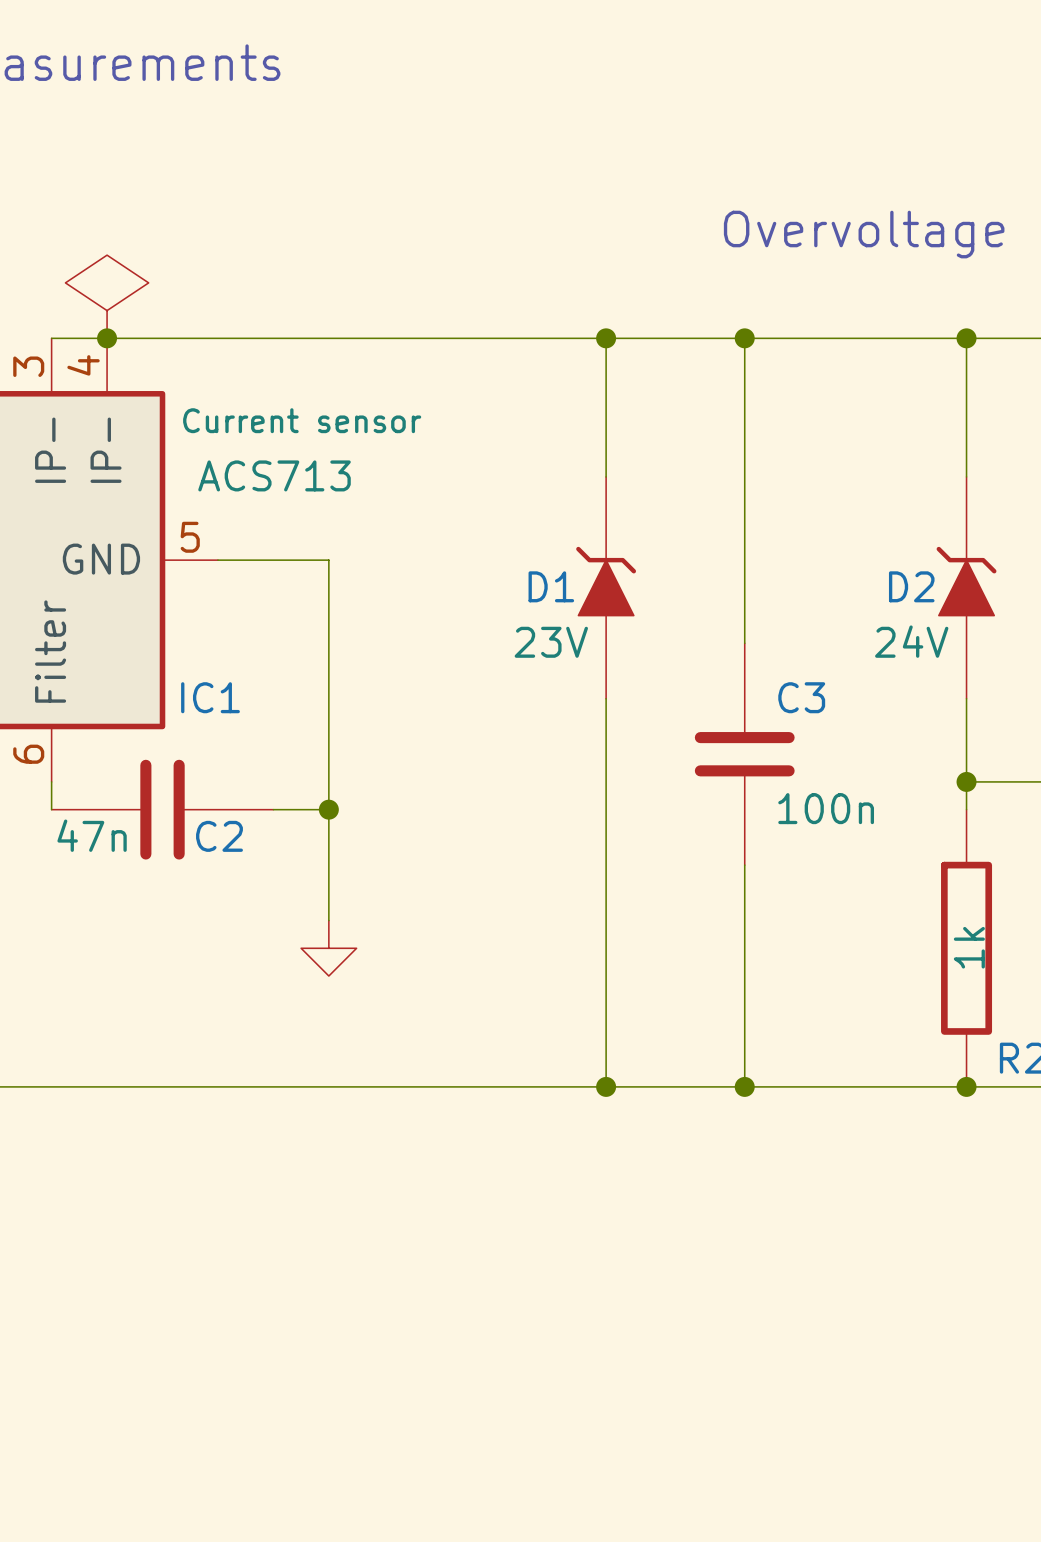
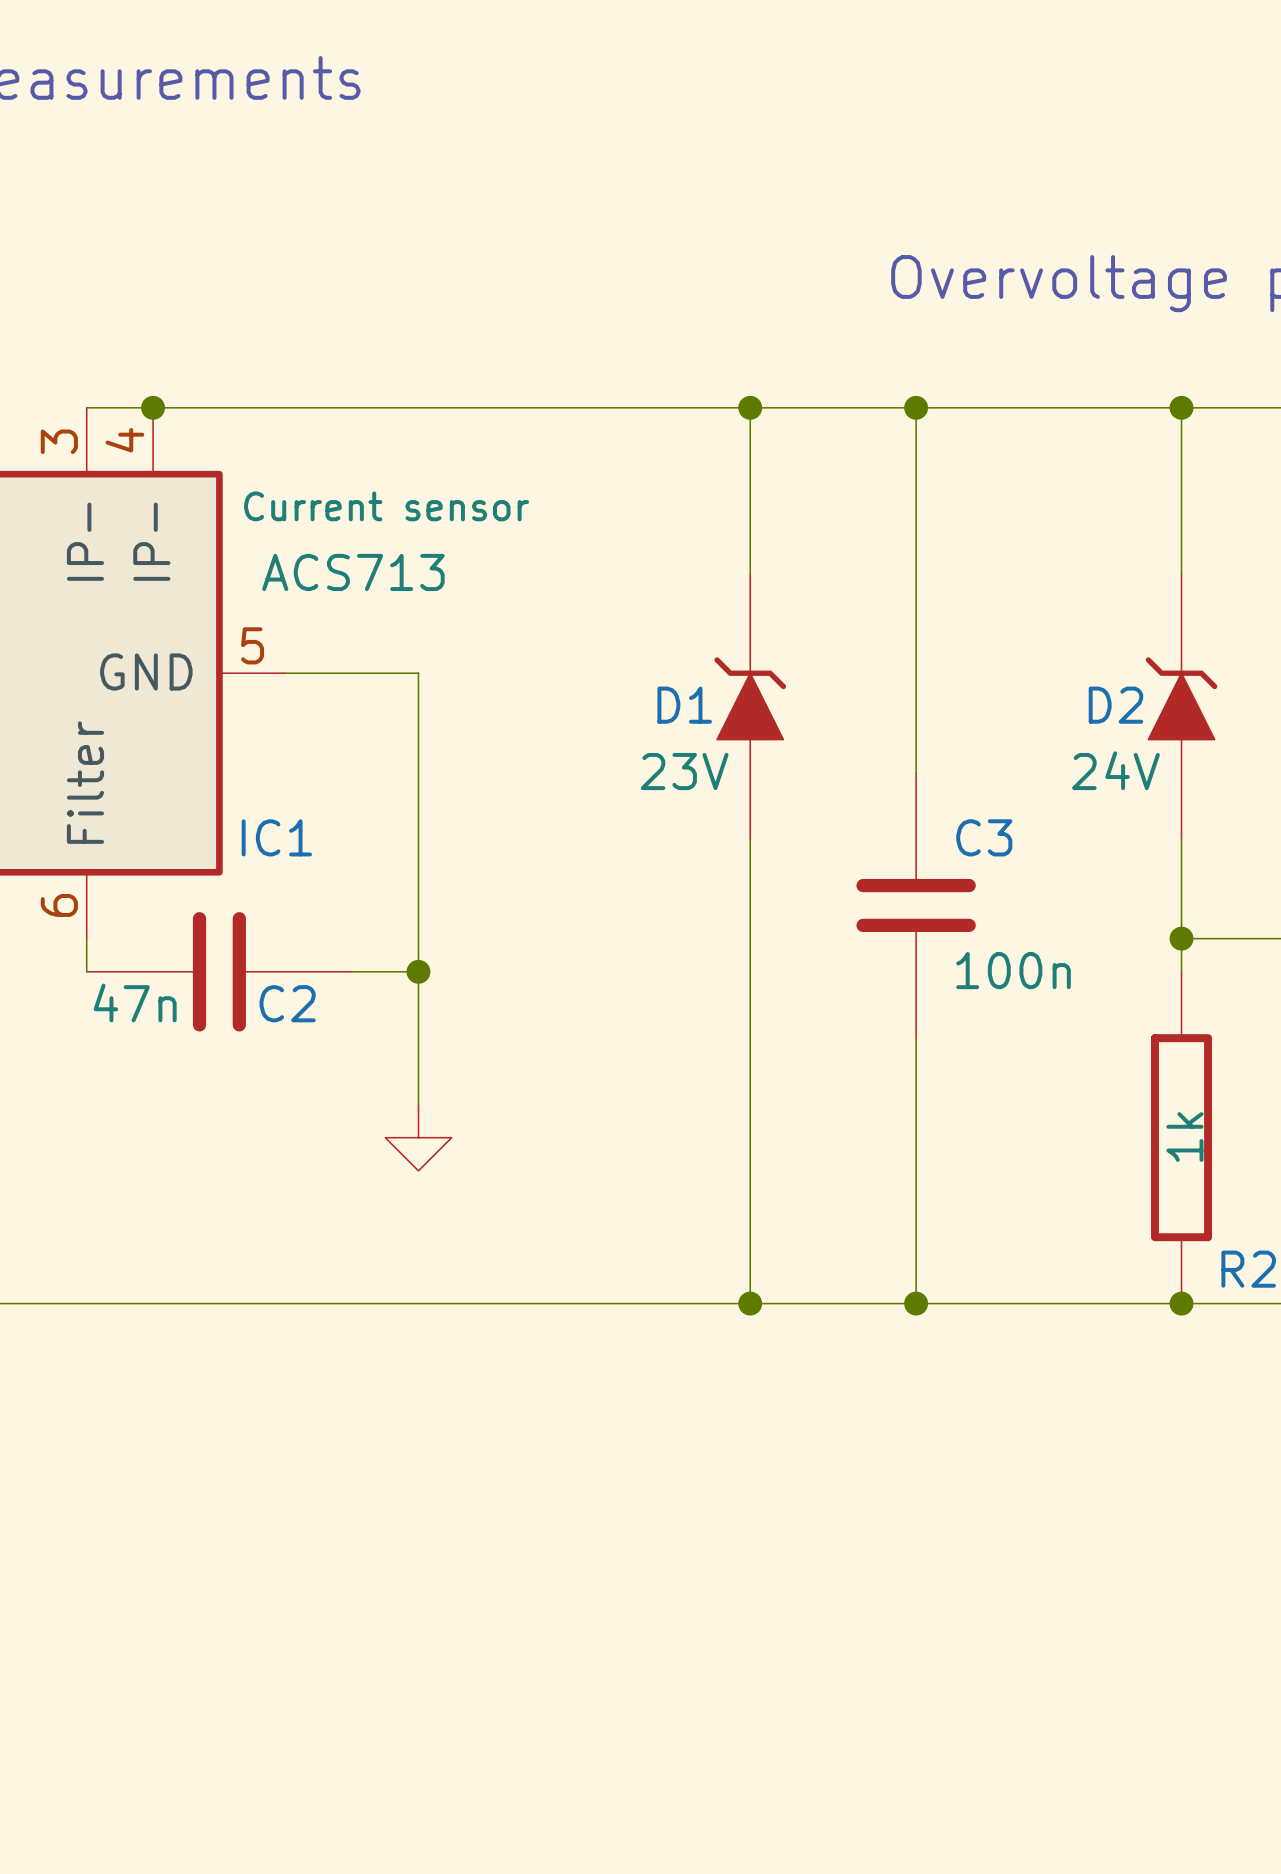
power symbol: (107, 296) -> none

